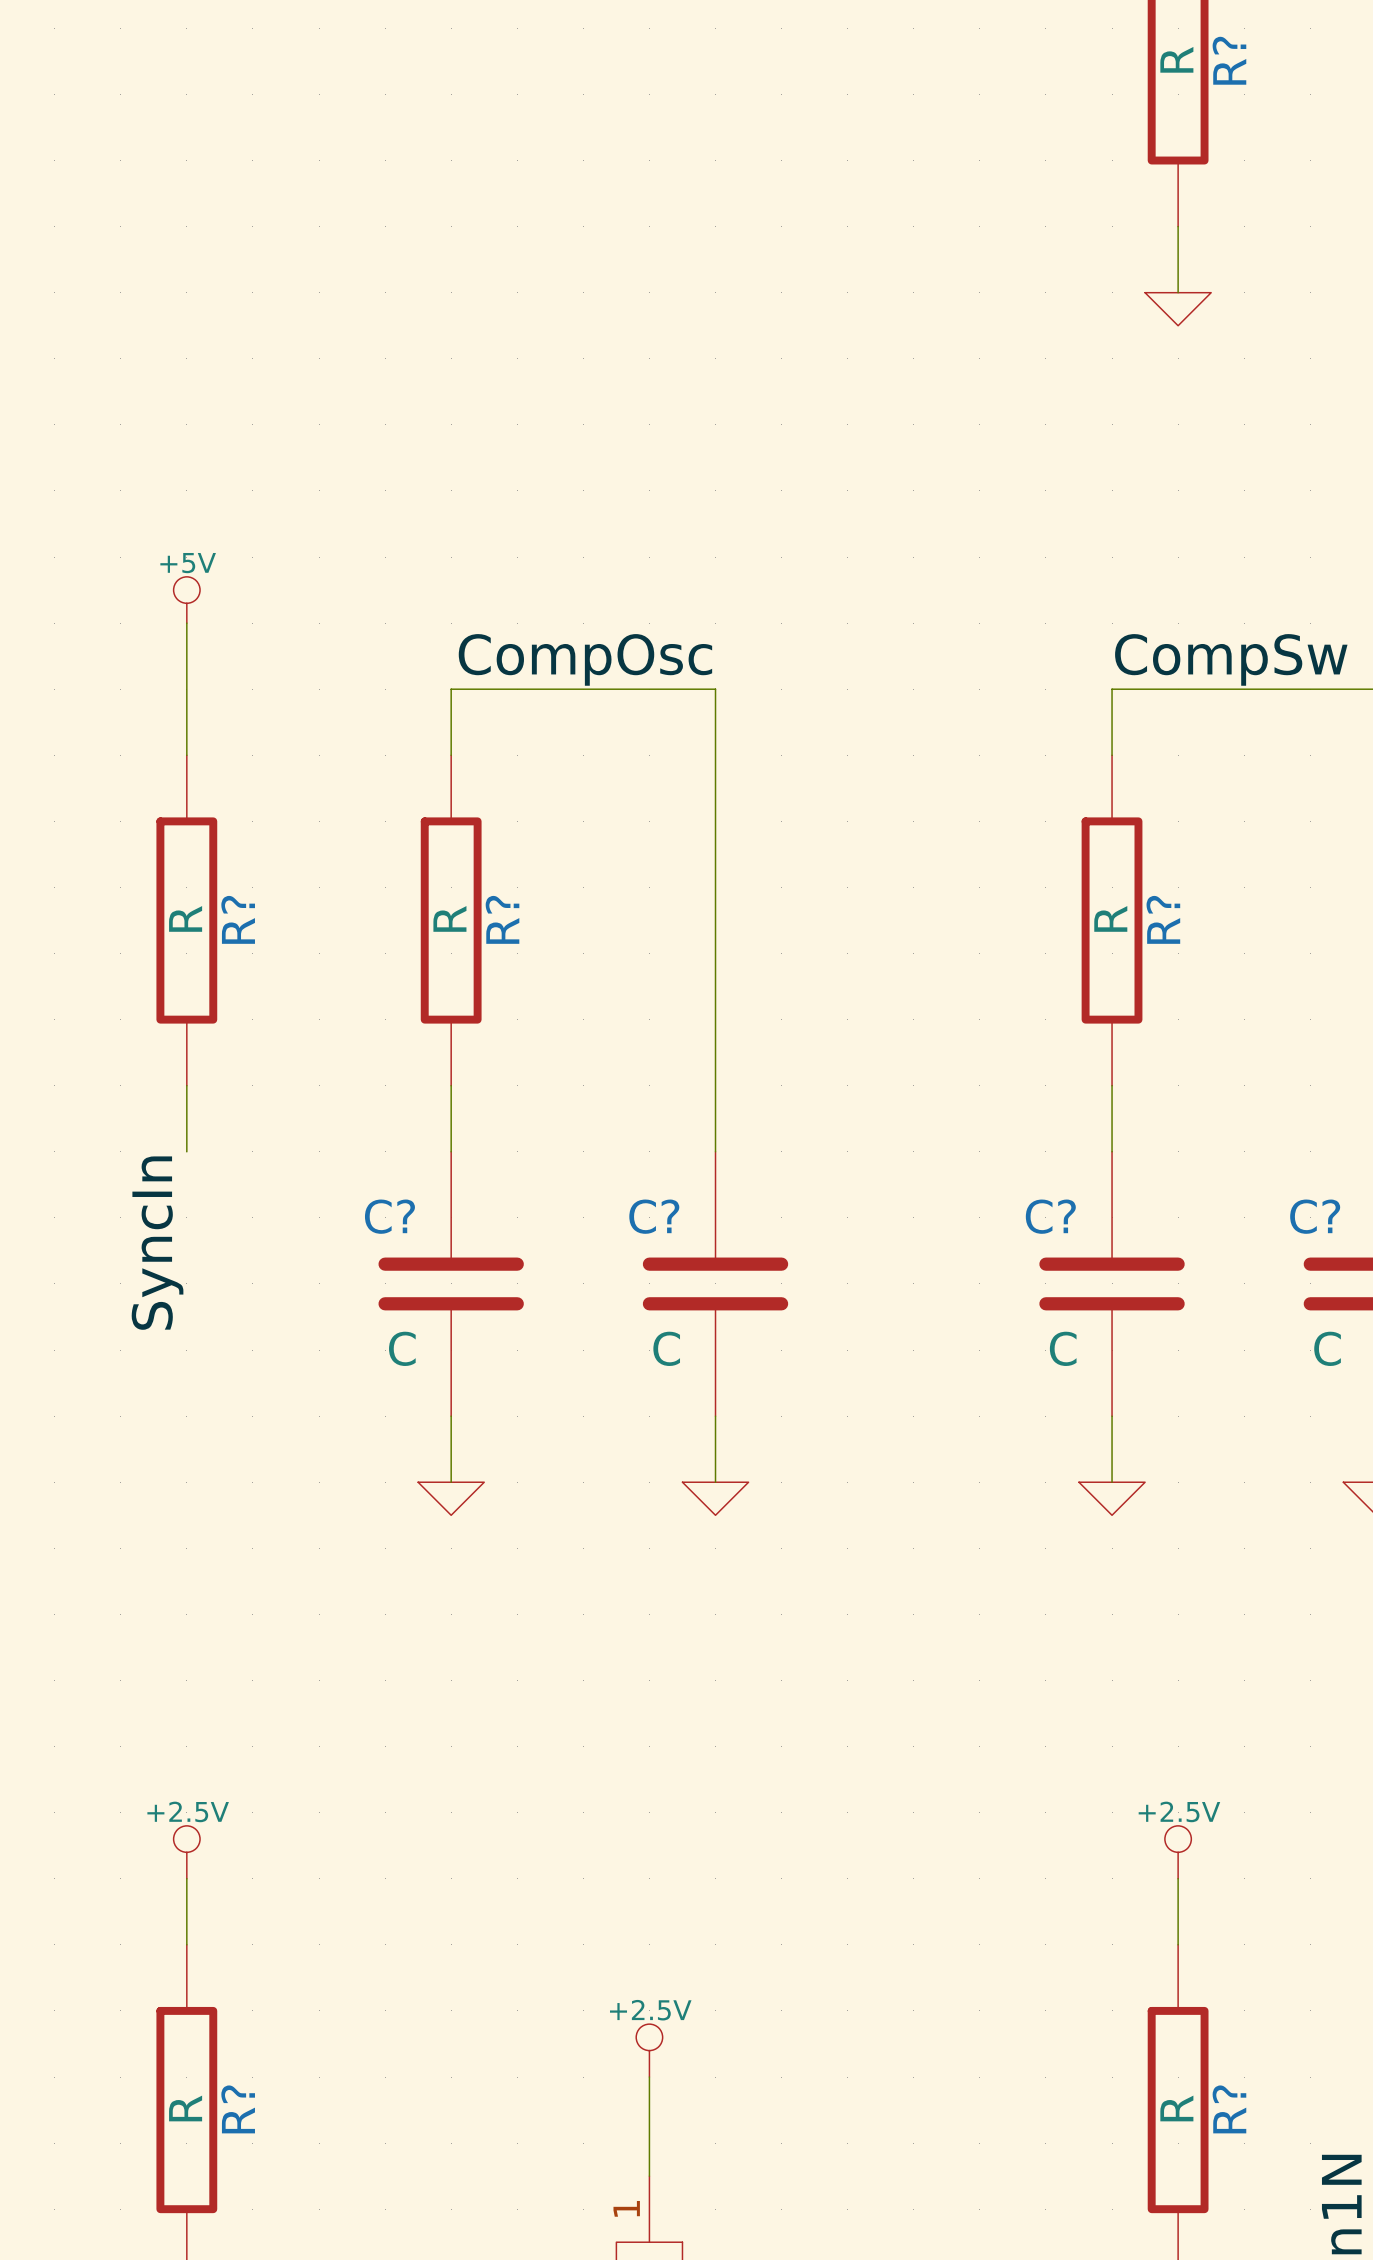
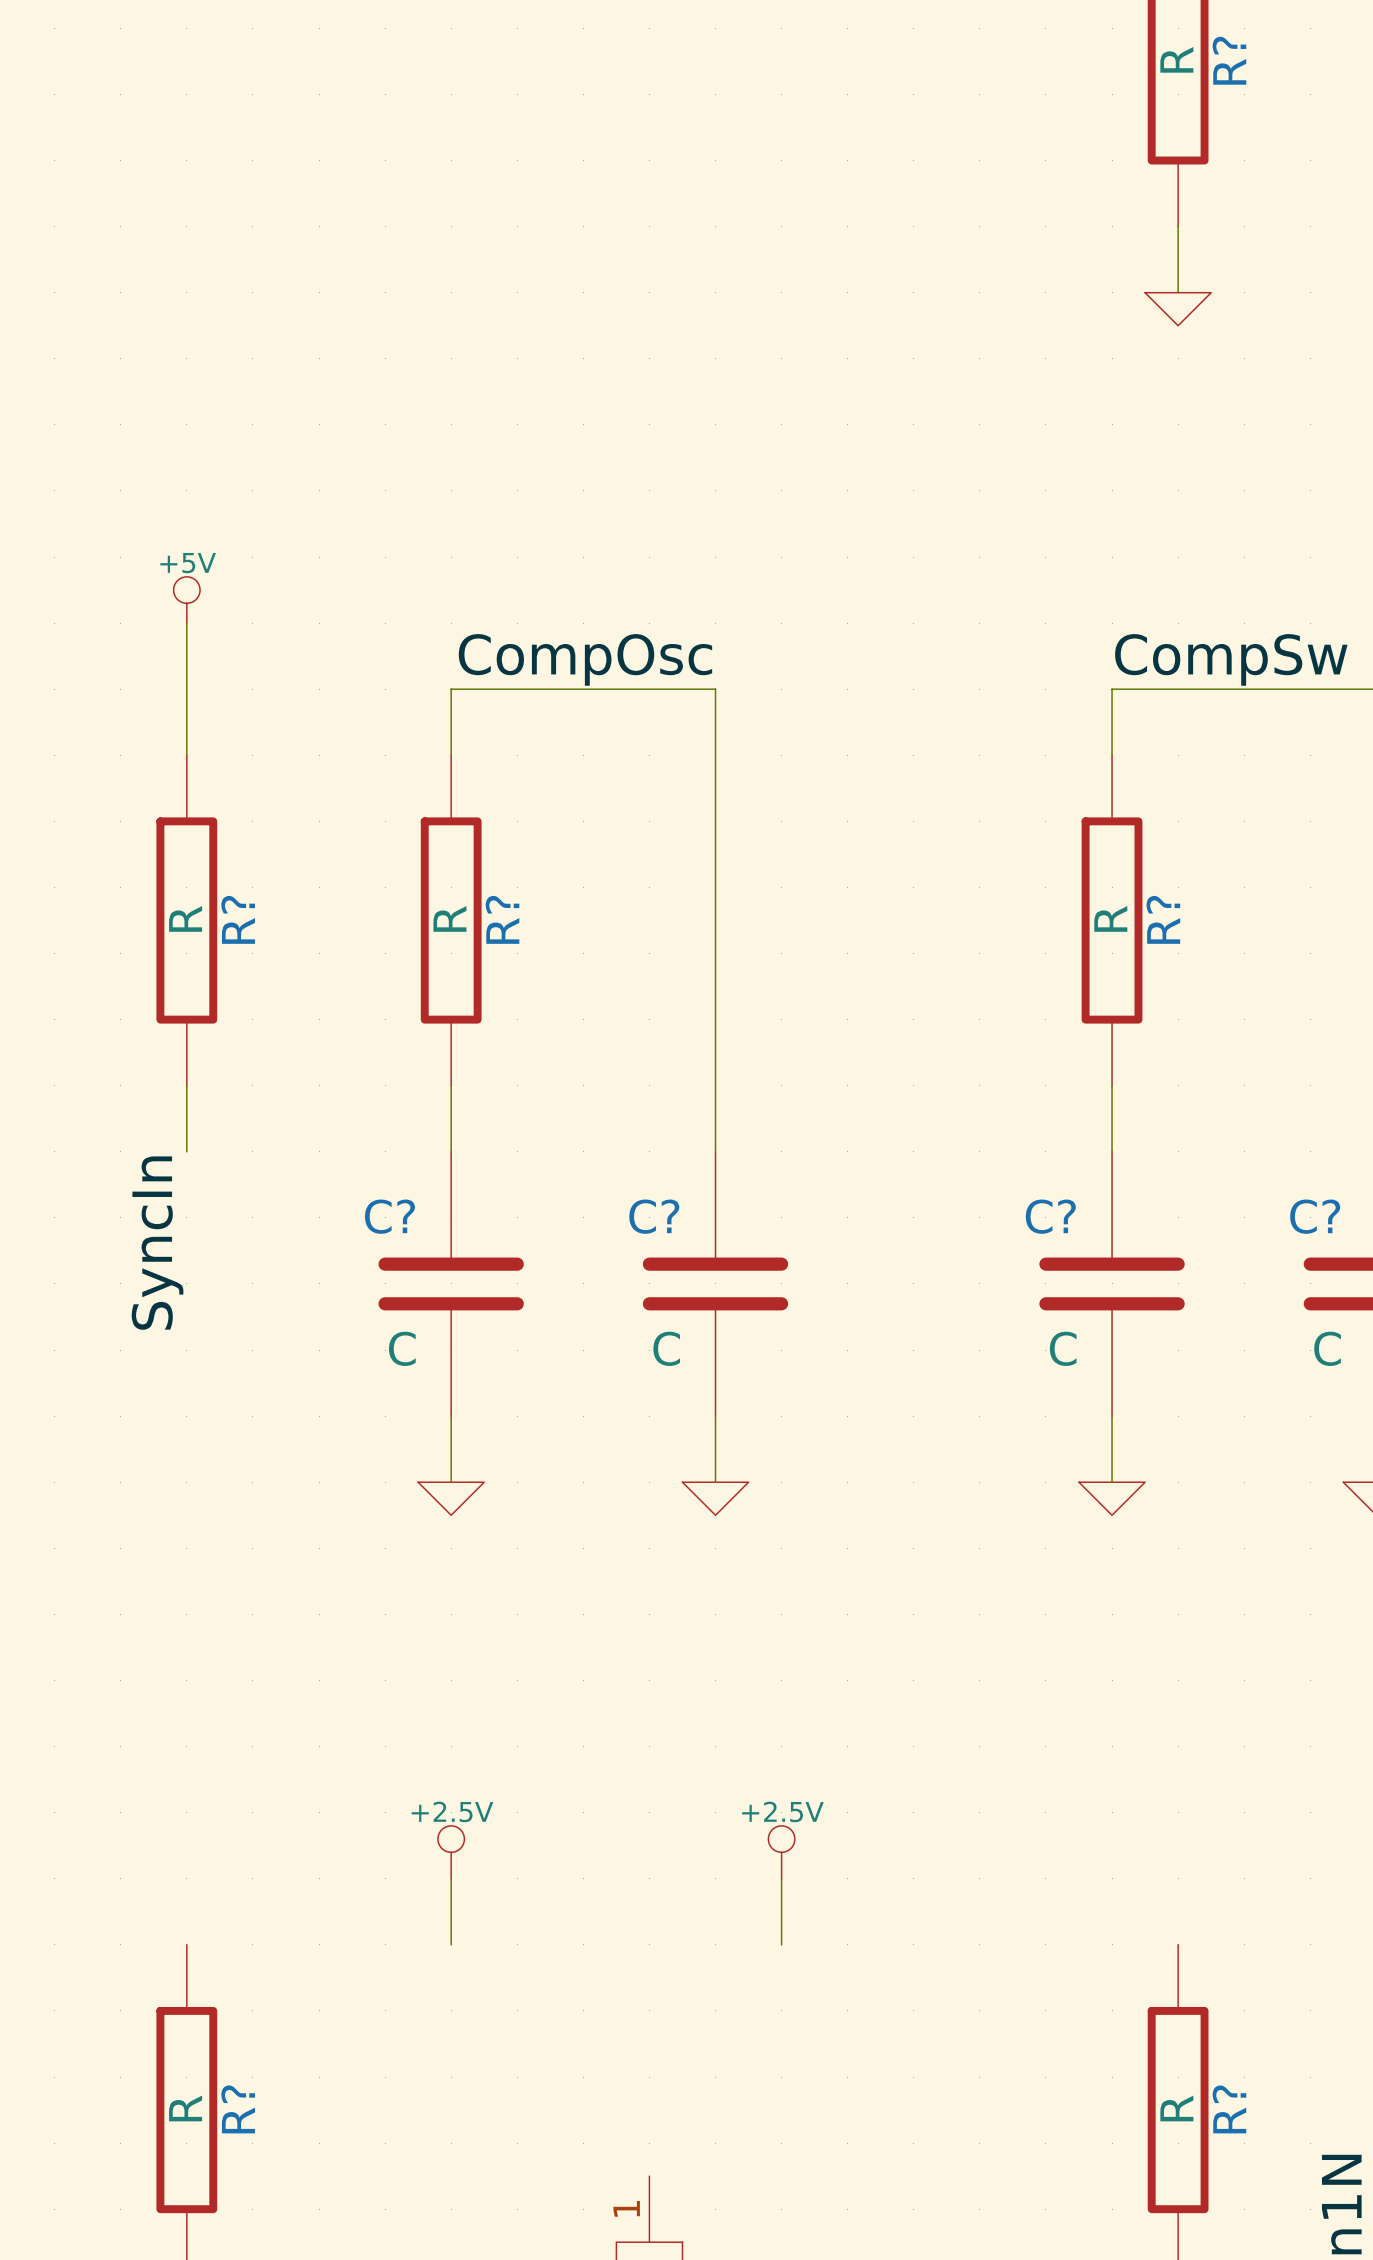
power symbol: +2.5V (186, 1852) -> none
power symbol: none -> +2.5V (451, 1852)
power symbol: none -> +2.5V (781, 1852)
power symbol: +2.5V (1178, 1852) -> none
wire: (186, 1878) (186, 1944) -> (451, 1878) (451, 1944)
wire: (1178, 1878) (1178, 1944) -> (781, 1878) (781, 1944)
power symbol: +2.5V (649, 2050) -> none
wire: (649, 2077) (649, 2176) -> none

